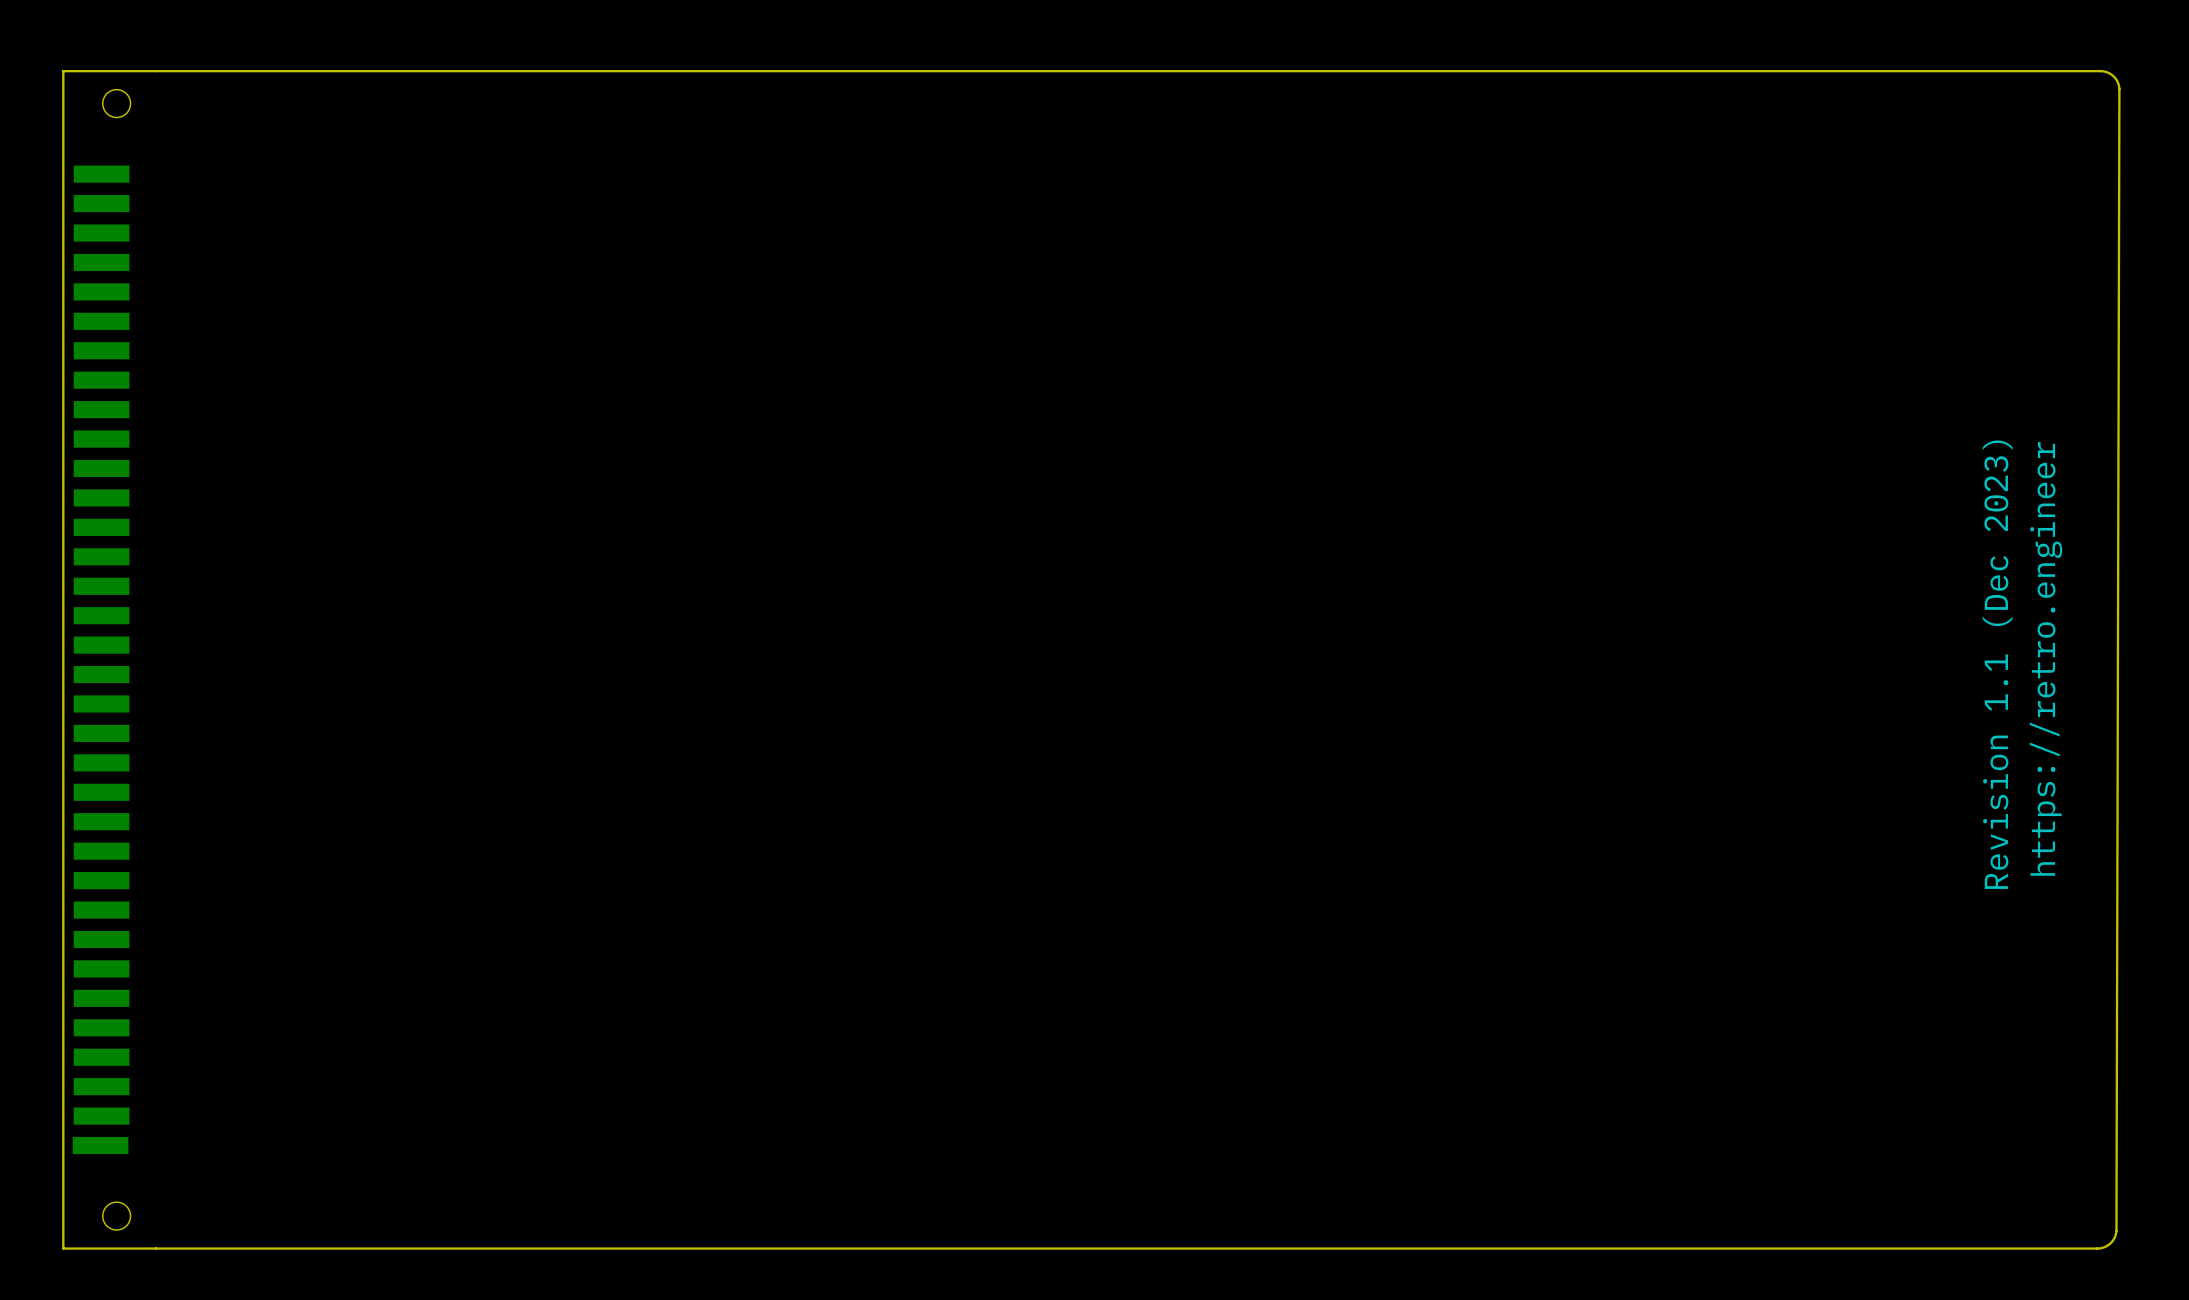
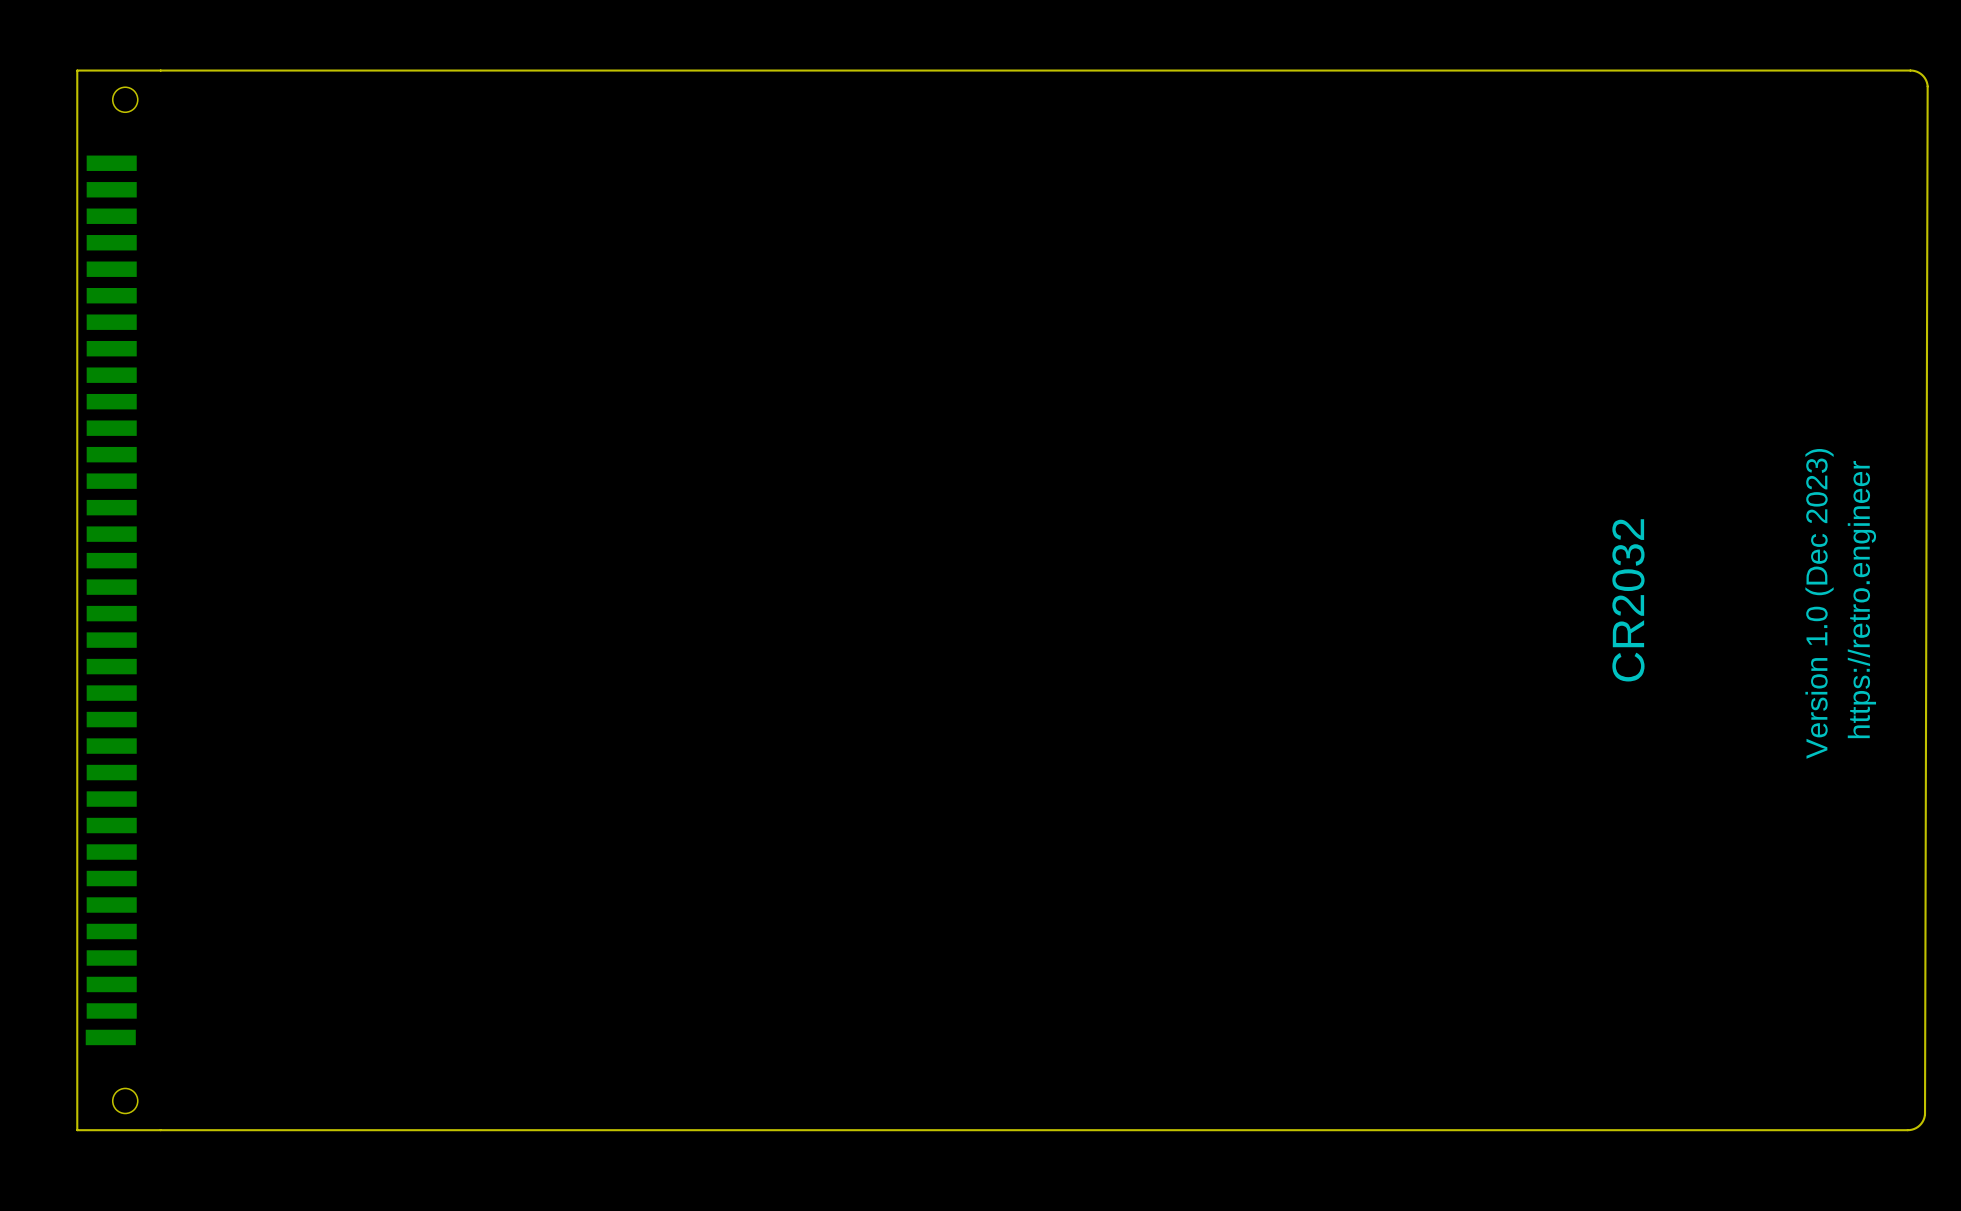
text: none -> CR2032 (1628, 600)
text: Revision 1.1 (Dec 2023) (1997, 664) -> Version 1.0 (Dec 2023) (1819, 603)

